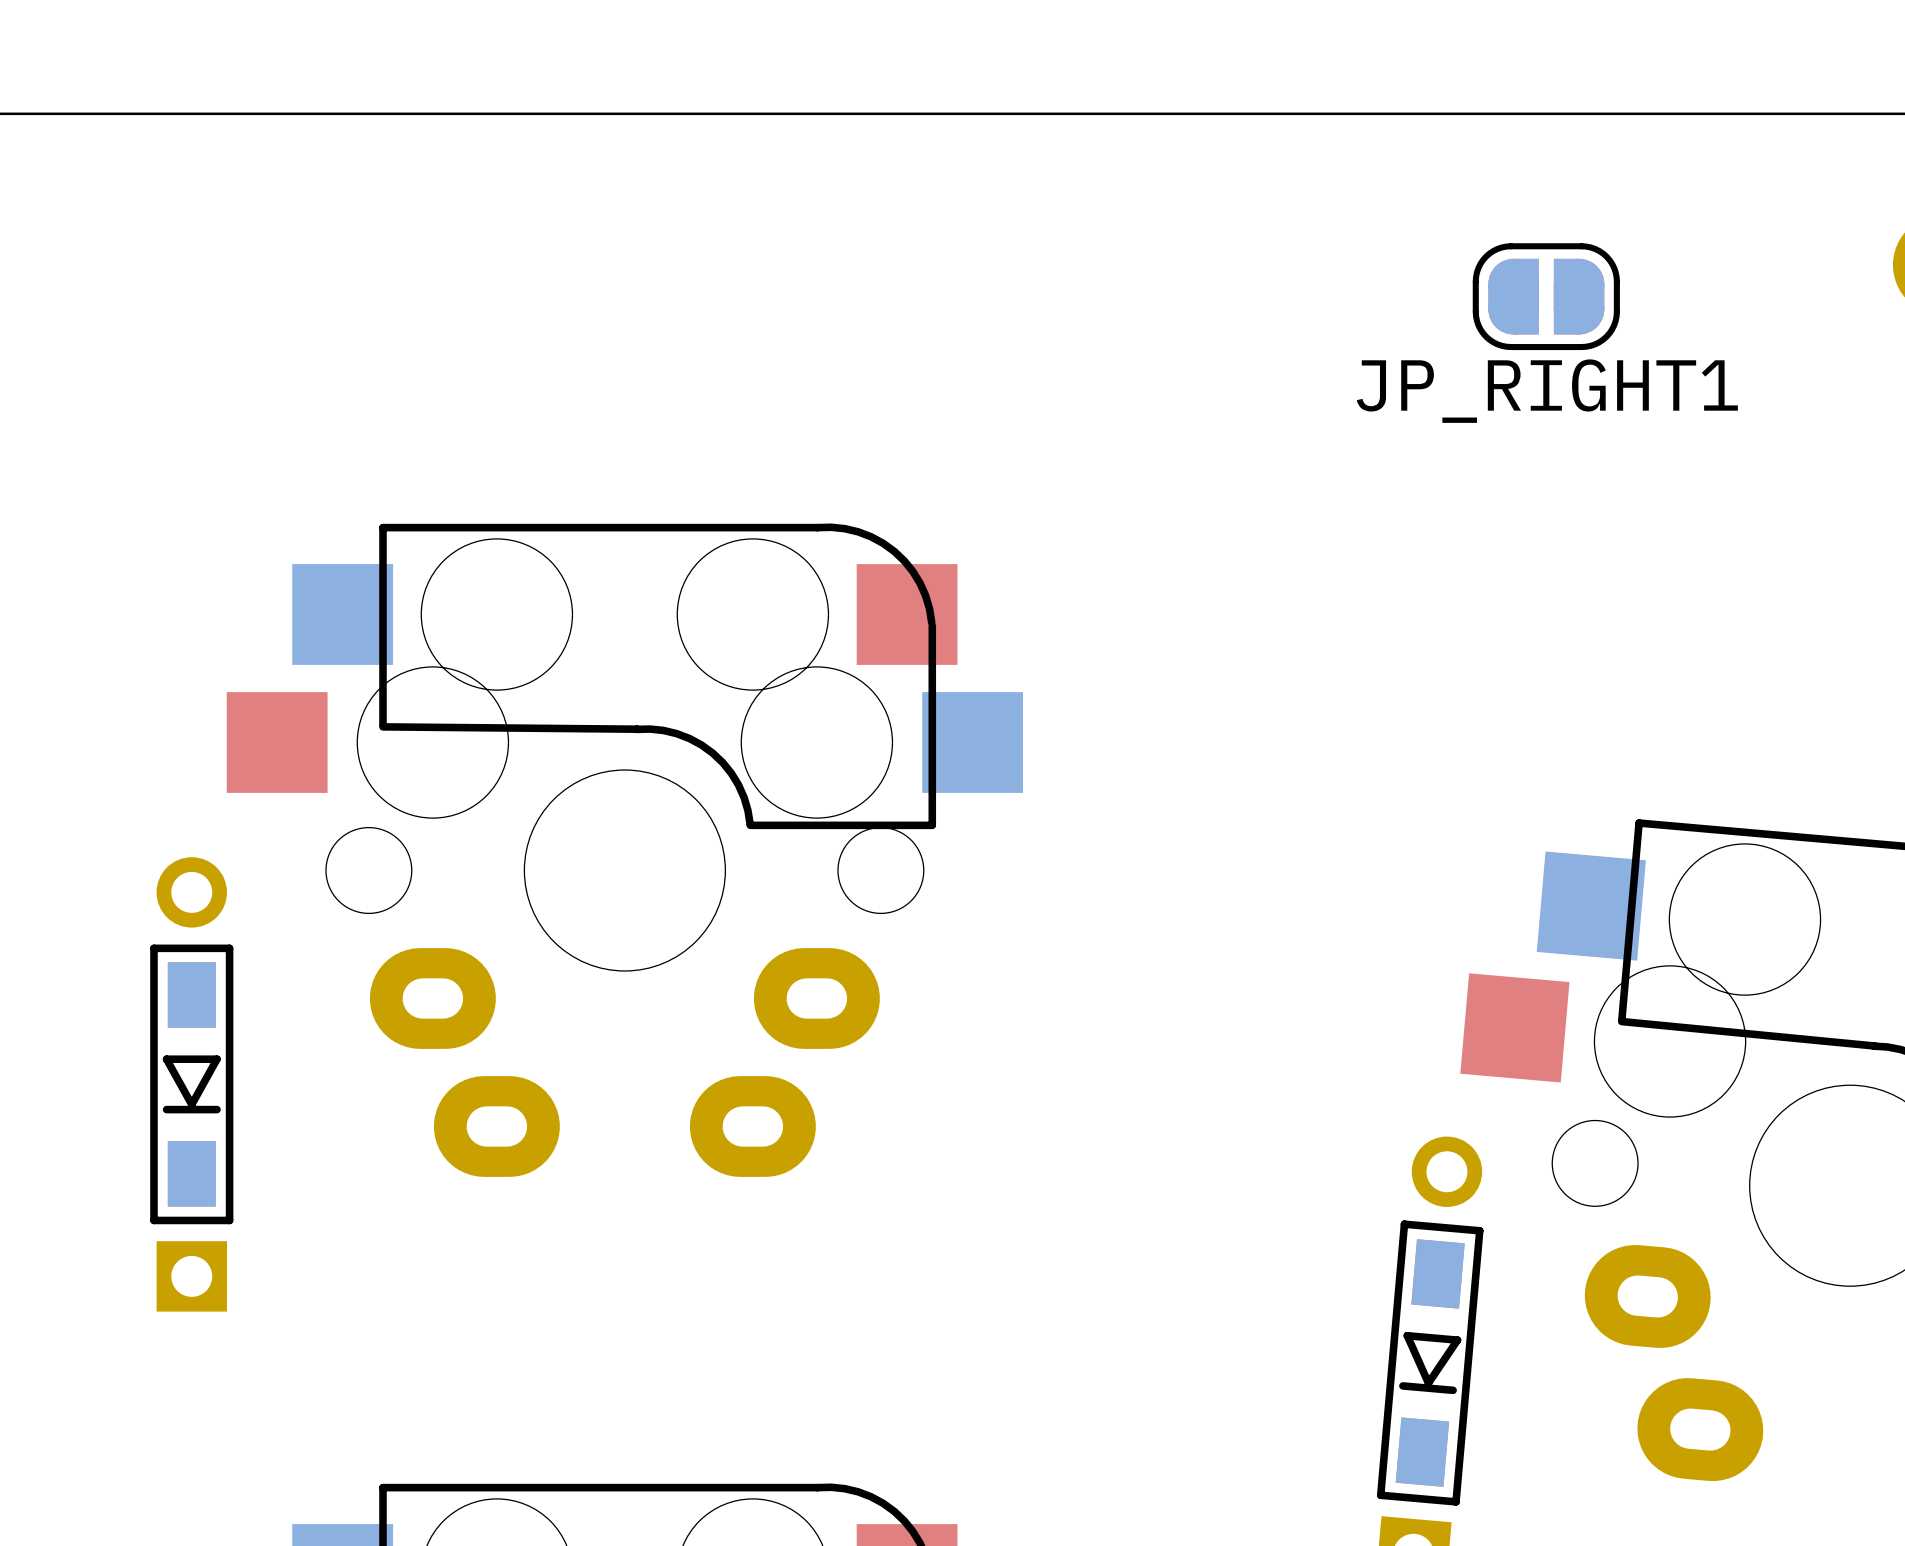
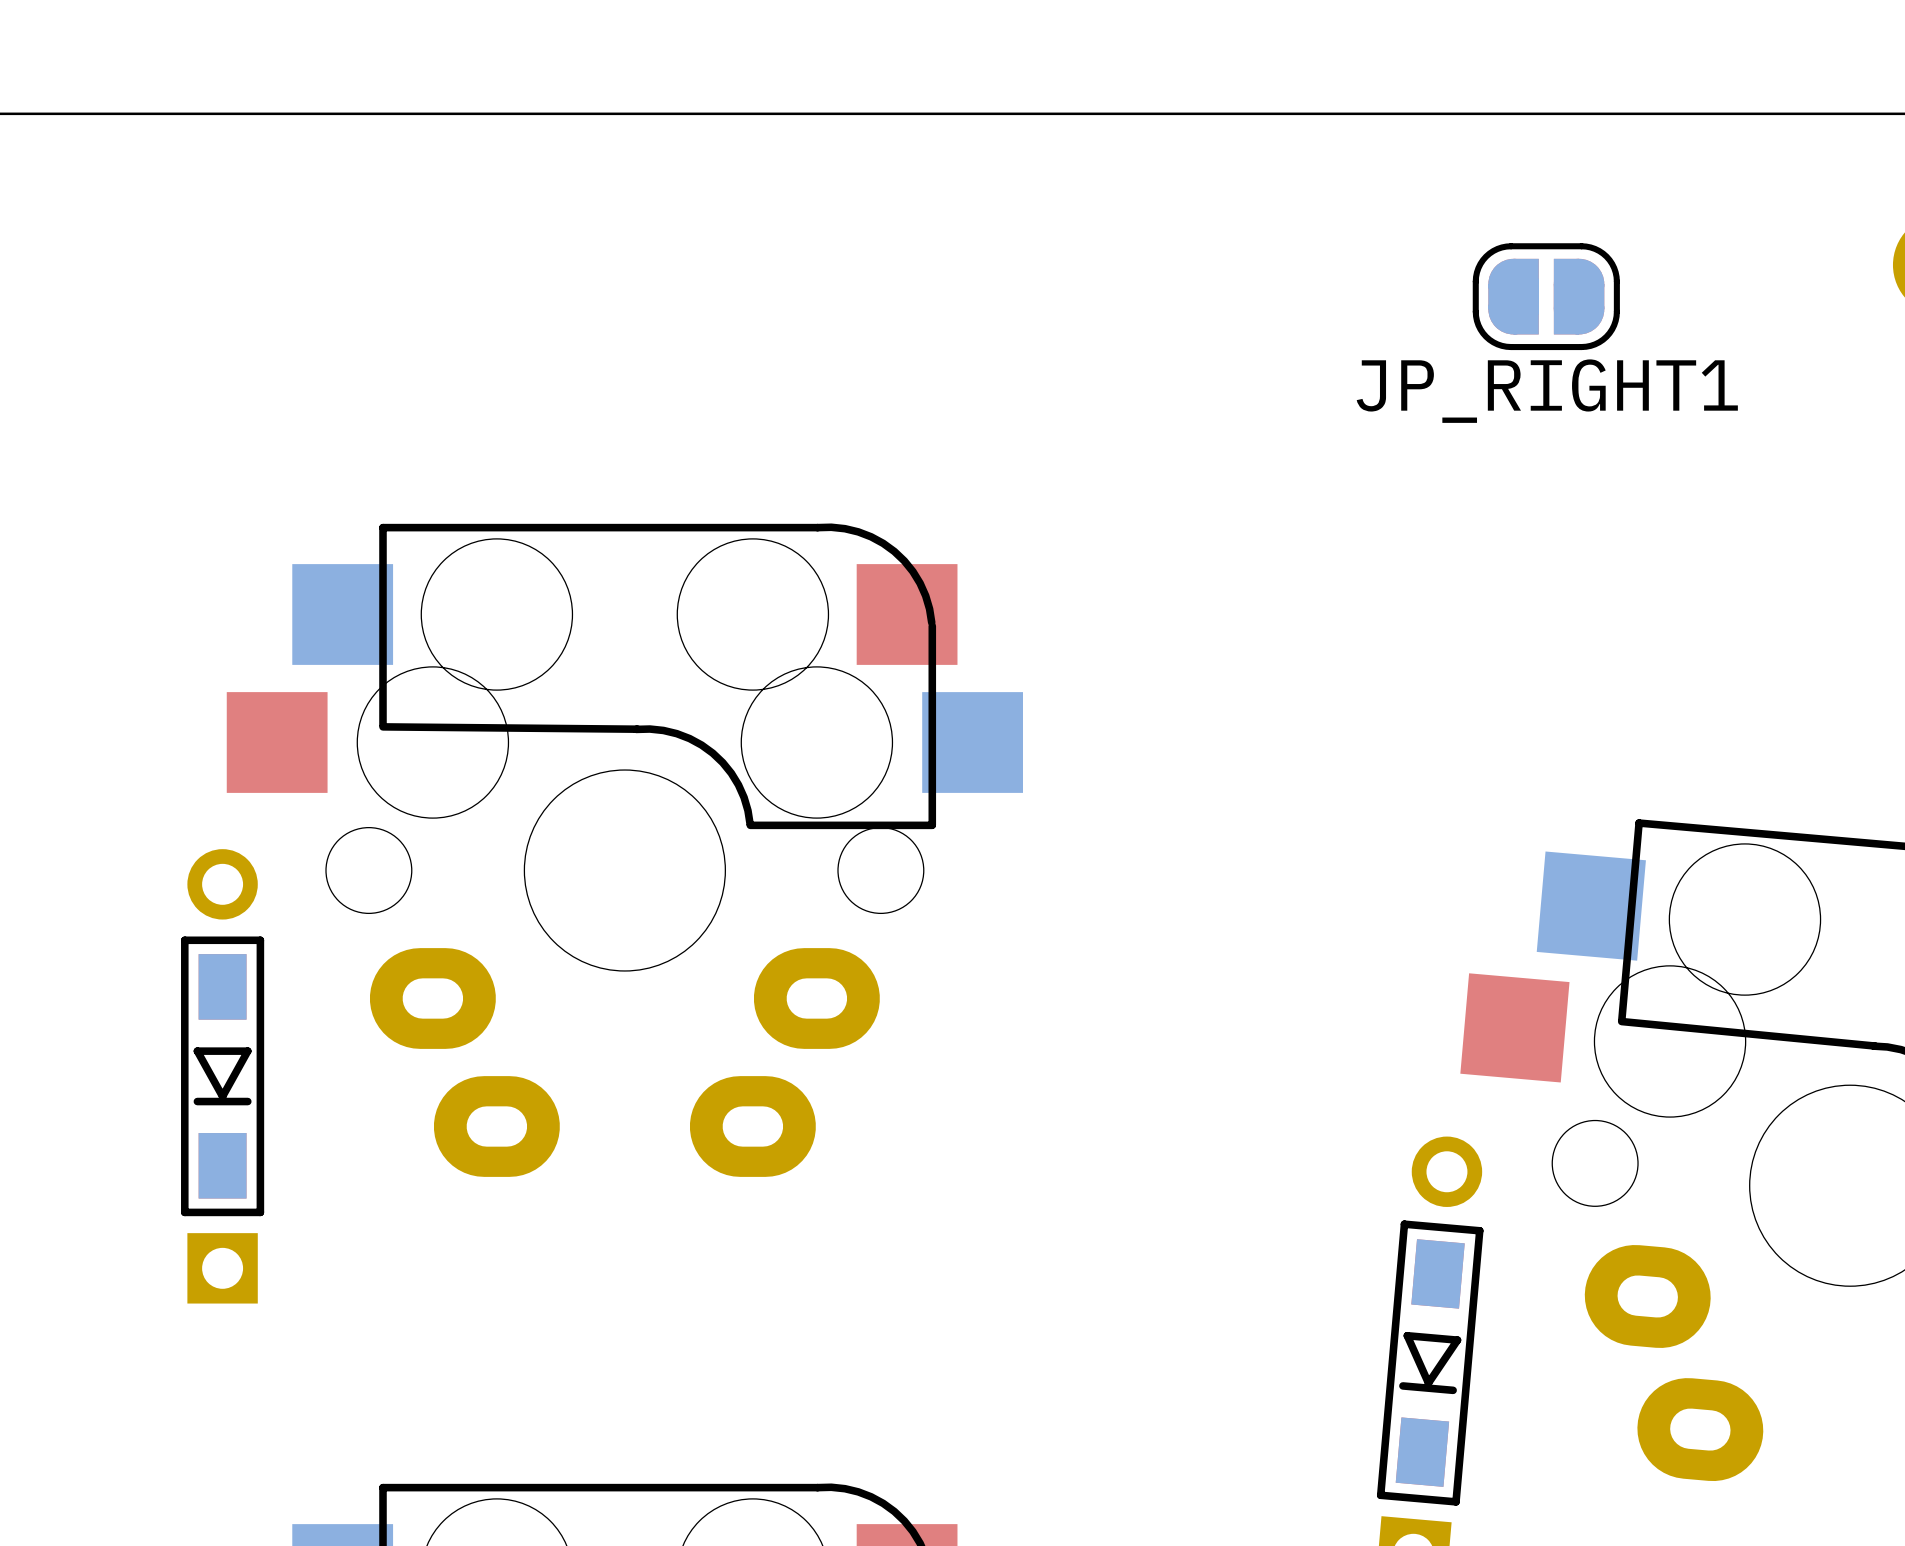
part position: (191, 1084) -> (222, 1076)

